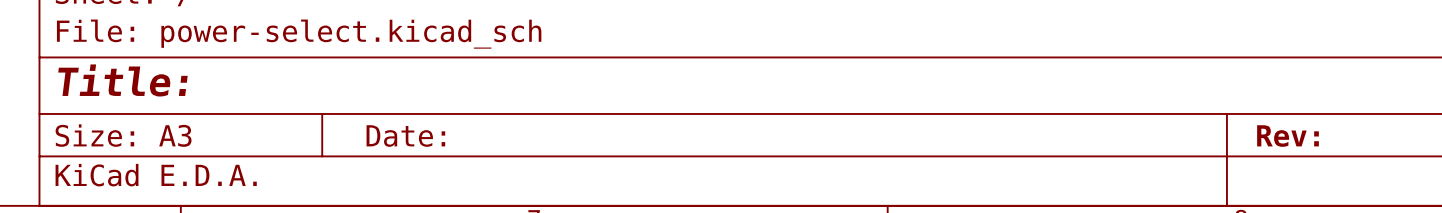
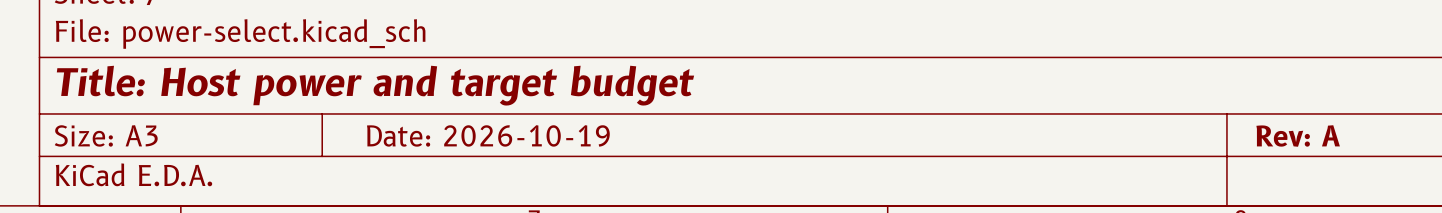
title block: Title: (122, 80) -> Title: Host power and target budget (375, 85)
title block: Date: (405, 136) -> Date: 2026-10-19 (488, 135)
title block: Rev: (1288, 136) -> Rev: A (1298, 135)

